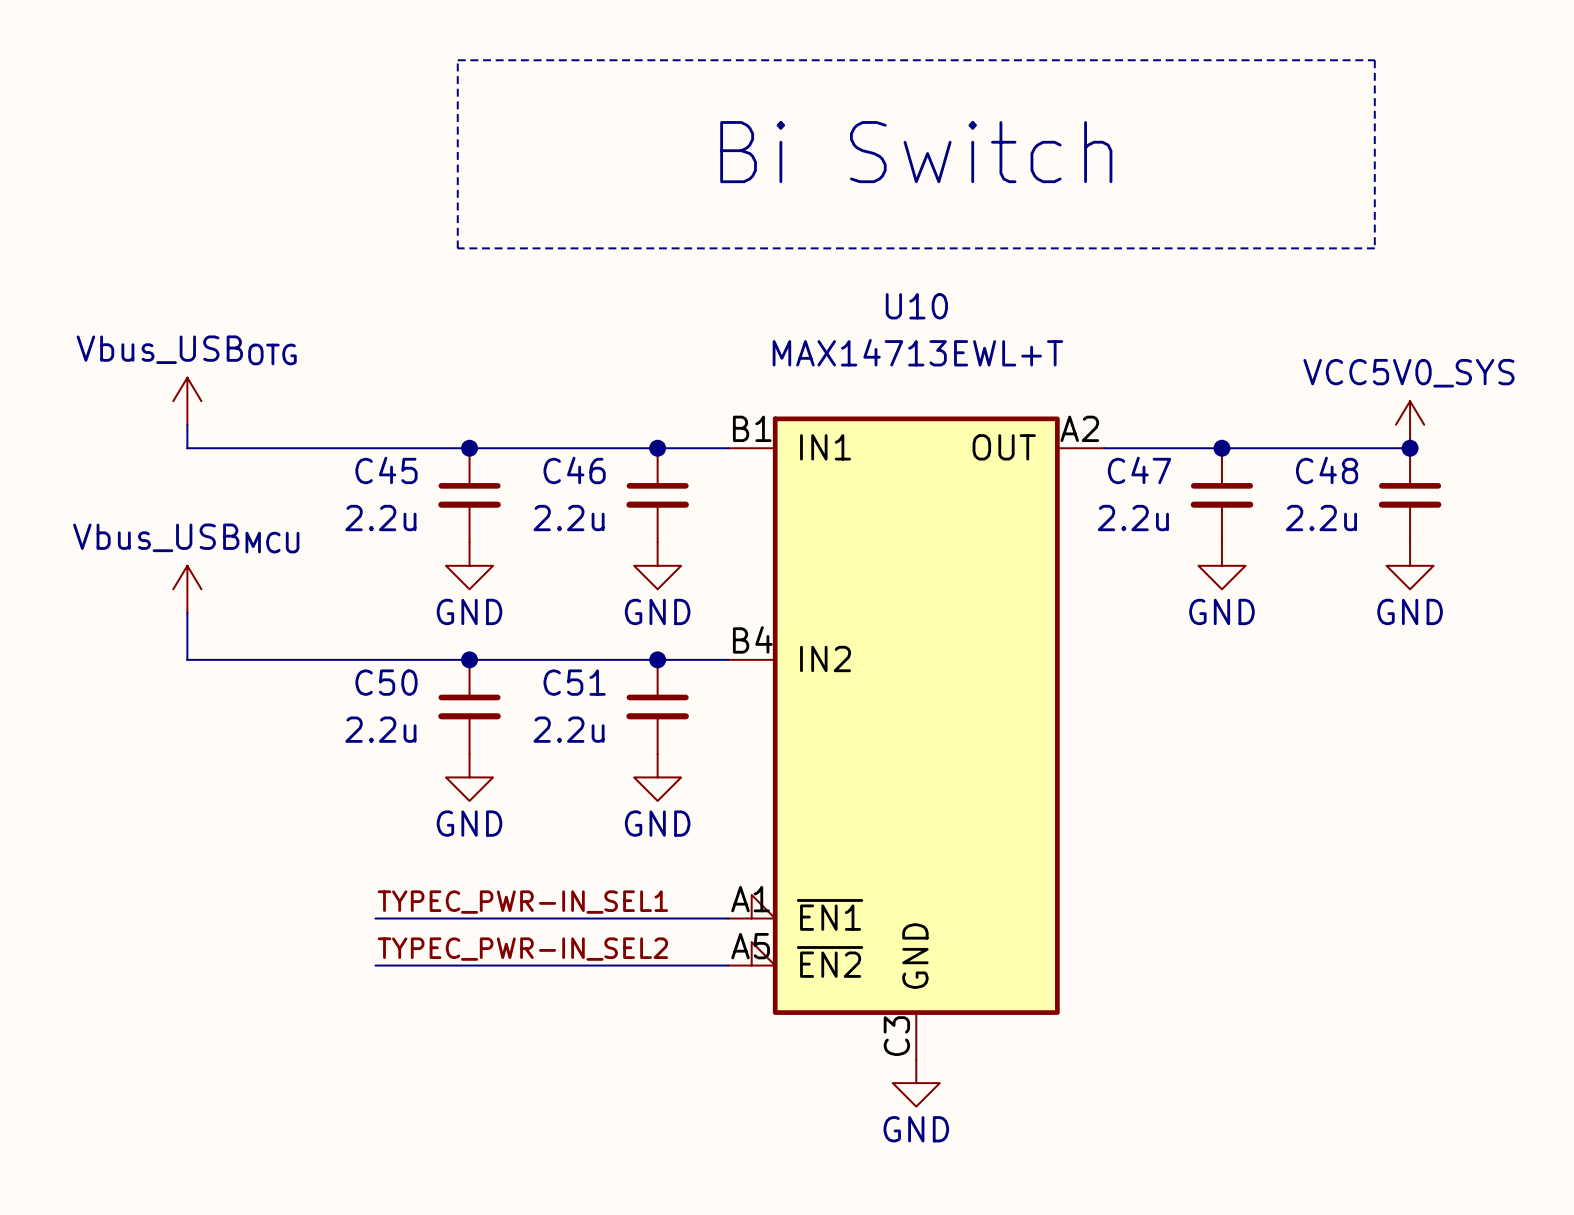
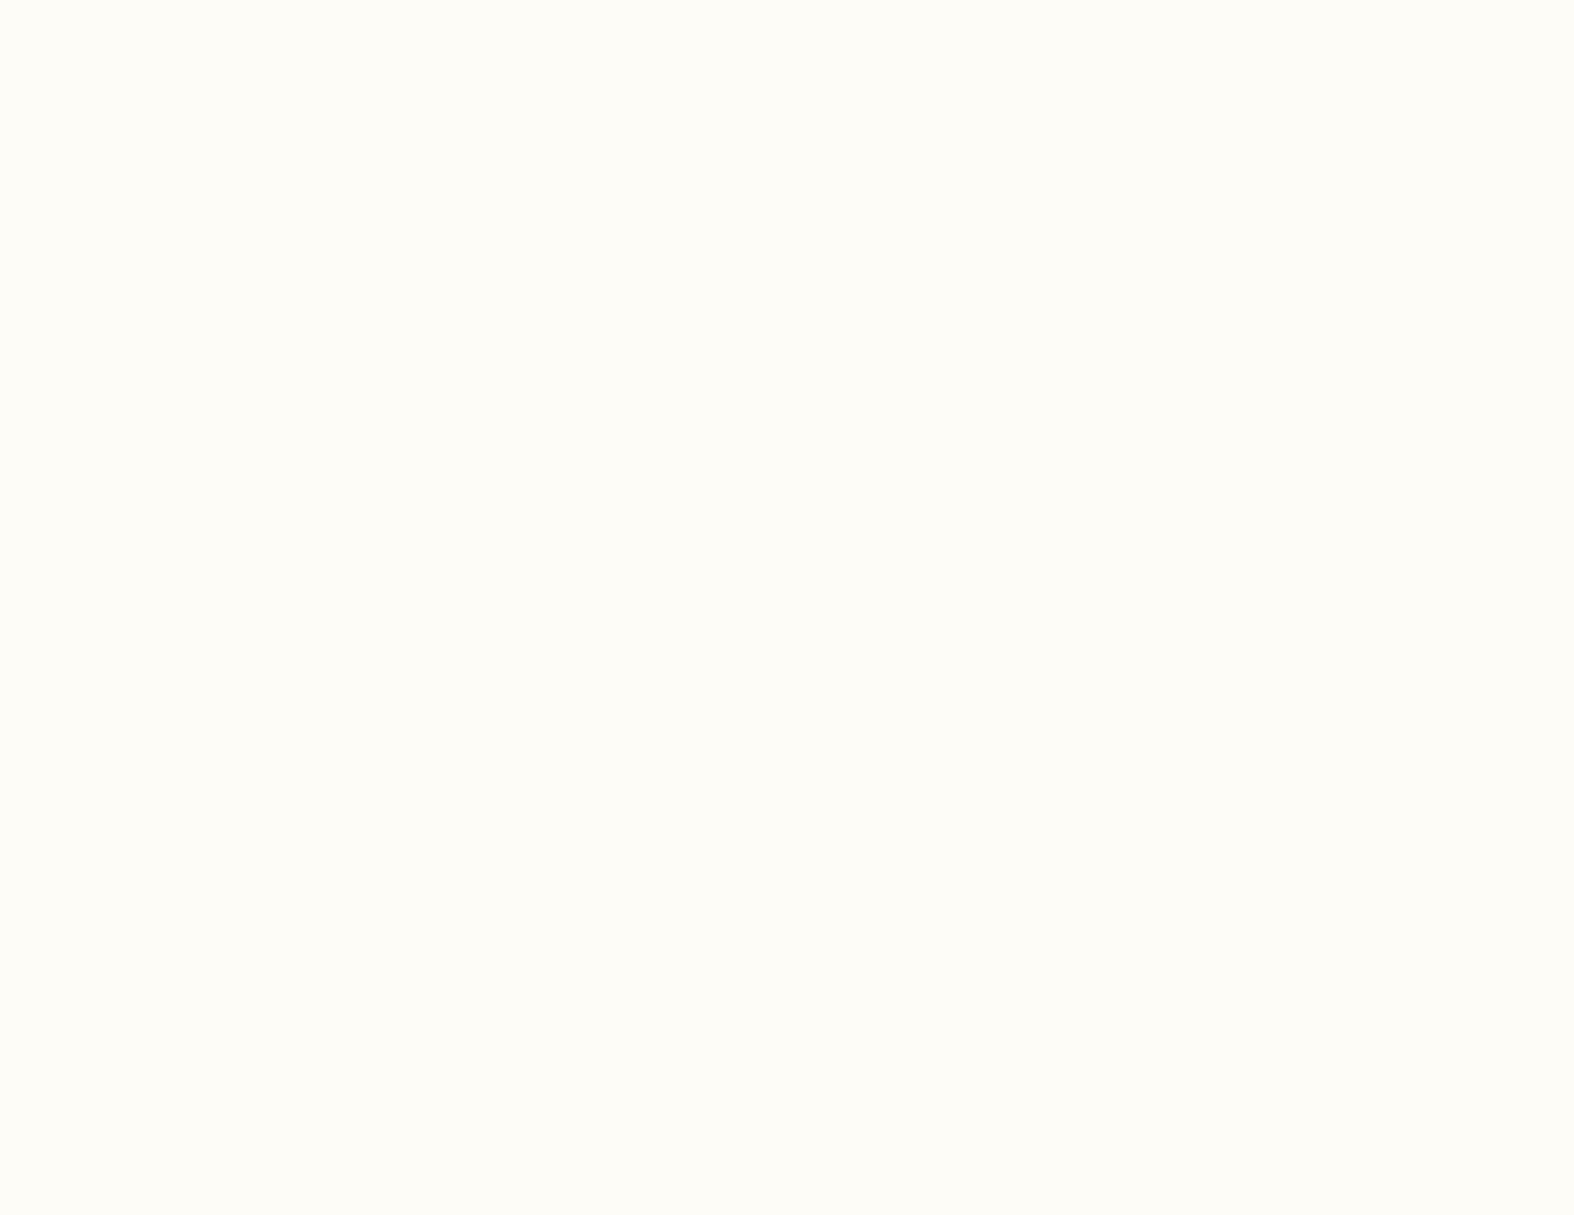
line: (457, 60) (1374, 60) (1374, 248) (457, 248) (457, 60) -> none
text: Bi Switch (916, 152) -> none
power symbol: Vbus_USBOTG (187, 401) -> none
wire: (187, 424) (187, 448) (728, 448) -> none
power symbol: VCC5V0_SYS (1410, 424) -> none
junction: (469, 448) -> none
junction: (657, 448) -> none
wire: (1104, 448) (1410, 448) -> none
junction: (1221, 448) -> none
junction: (1410, 448) -> none
C45: 2.2u (469, 495) -> none
C46: 2.2u (657, 495) -> none
C47: 2.2u (1221, 495) -> none
C48: 2.2u (1410, 495) -> none
power symbol: GND (469, 565) -> none
power symbol: GND (657, 565) -> none
power symbol: GND (1221, 565) -> none
power symbol: GND (1410, 565) -> none
power symbol: Vbus_USBMCU (187, 589) -> none
wire: (187, 612) (187, 659) (728, 659) -> none
junction: (469, 659) -> none
junction: (657, 659) -> none
C50: 2.2u (469, 706) -> none
C51: 2.2u (657, 706) -> none
U10: MAX14713EWL+T (916, 738) -> none
power symbol: GND (469, 777) -> none
power symbol: GND (657, 777) -> none
label: TYPEC_PWR-IN_SEL1 (522, 902) -> none
wire: (375, 918) (728, 918) -> none
label: TYPEC_PWR-IN_SEL2 (522, 949) -> none
wire: (375, 965) (728, 965) -> none
power symbol: GND (916, 1083) -> none

